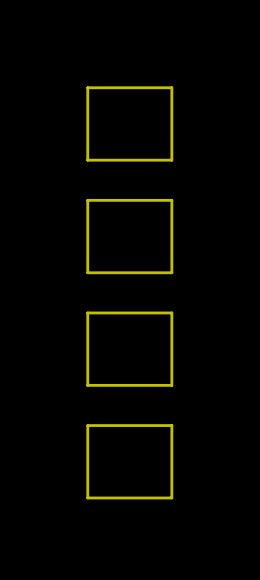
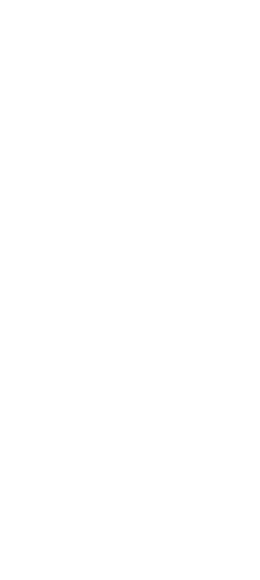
part: (129, 123) -> none
part: (129, 236) -> none
part: (129, 349) -> none
part: (129, 461) -> none

